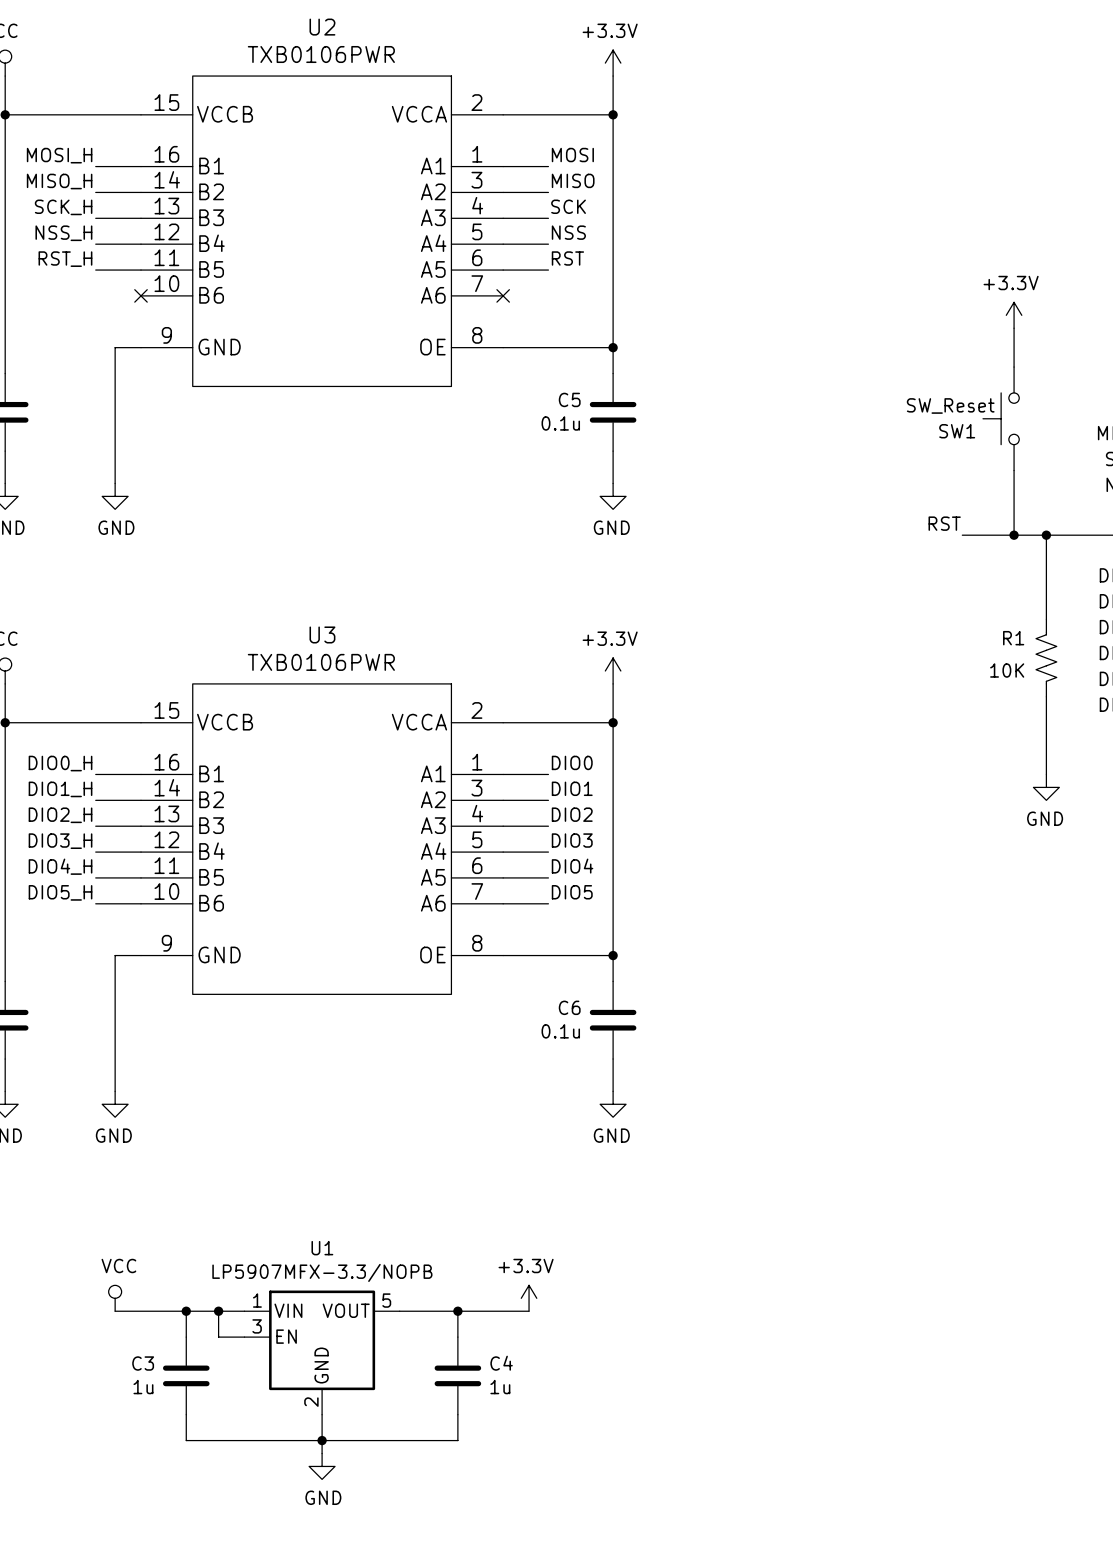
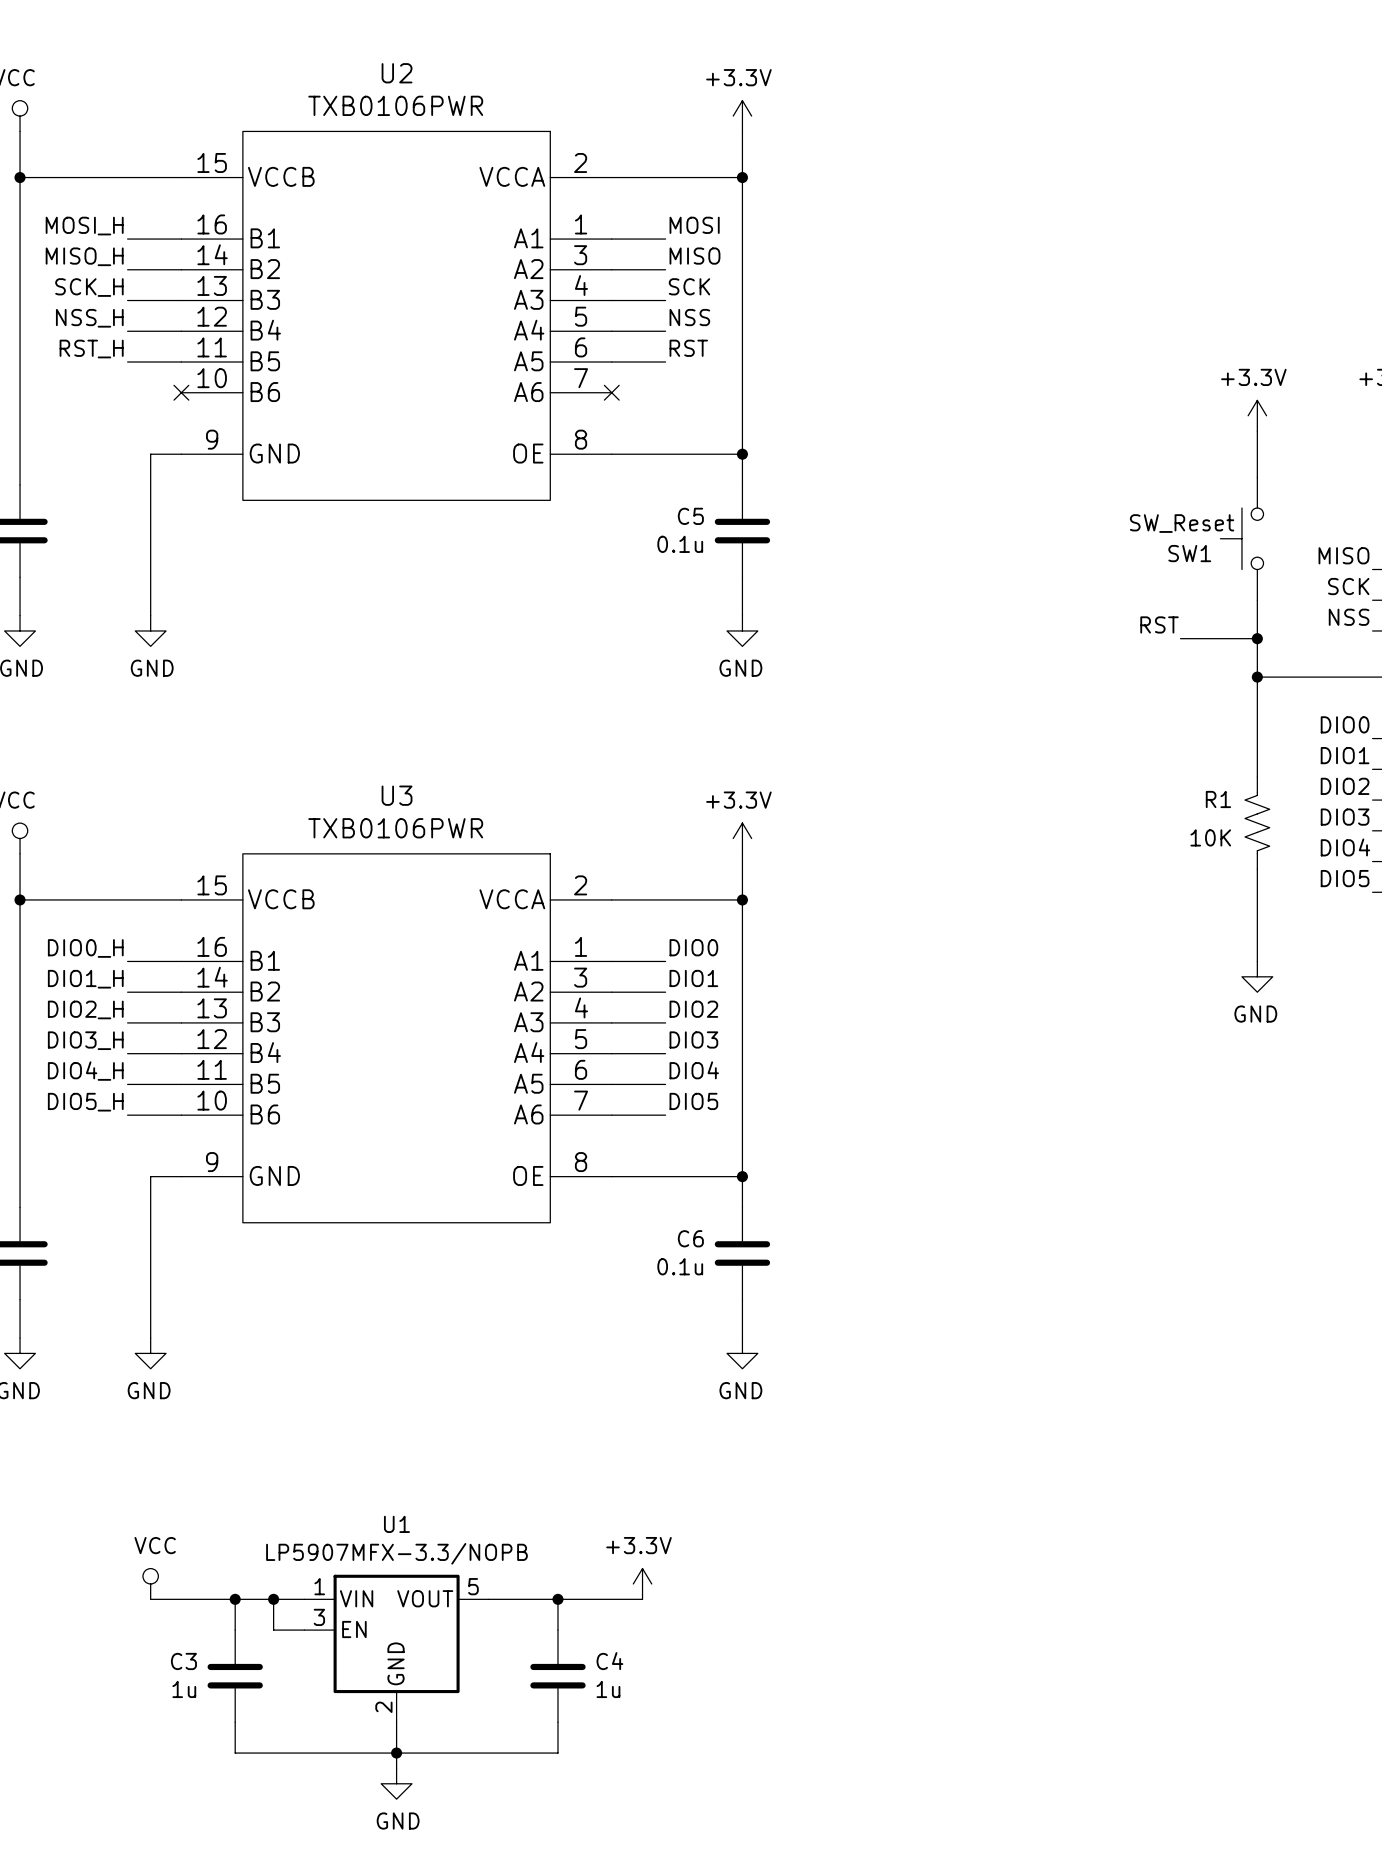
power symbol position: +3.3V (1014, 315) -> +3.3V (1257, 415)
wire: (1014, 328) (1014, 367) -> (1257, 431) (1257, 477)
SW1 position: (1001, 418) -> (1241, 538)
wire: (1014, 470) (1014, 535) -> none
wire: none -> (1180, 638) (1257, 638)
label position: RST (944, 523) -> RST (1159, 624)
wire: (962, 535) (1046, 535) -> (1257, 600) (1257, 677)
junction position: (1014, 535) -> (1257, 638)

